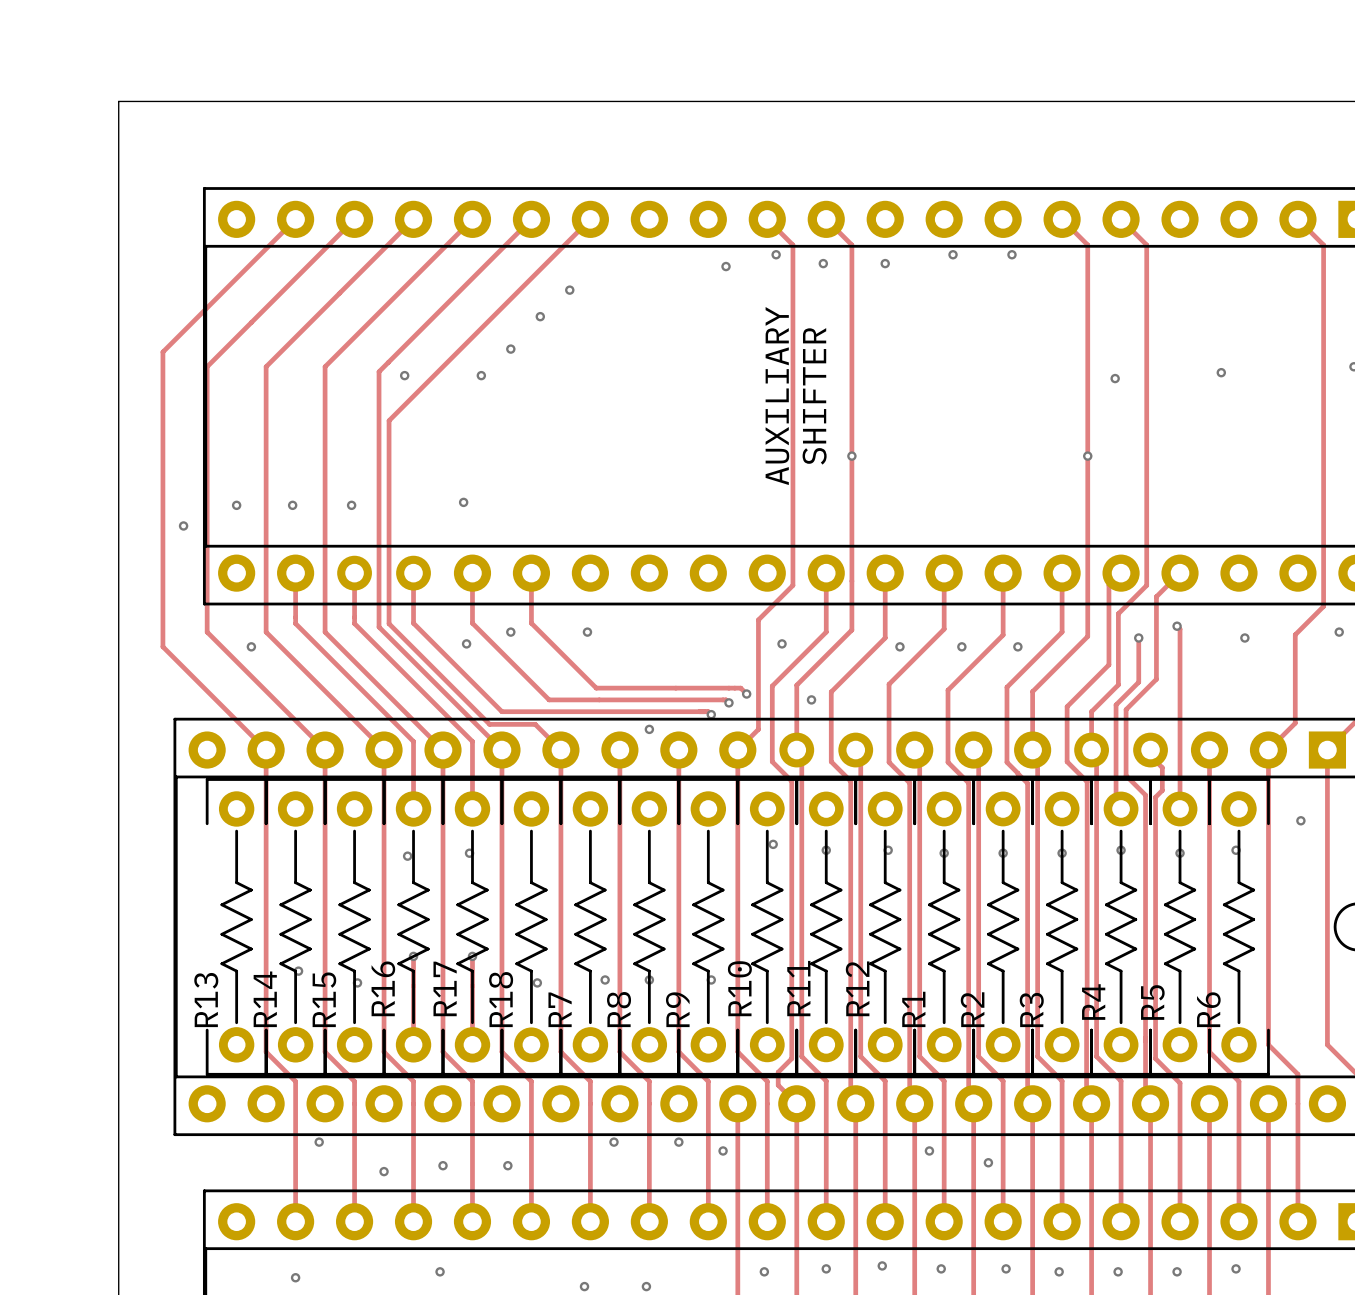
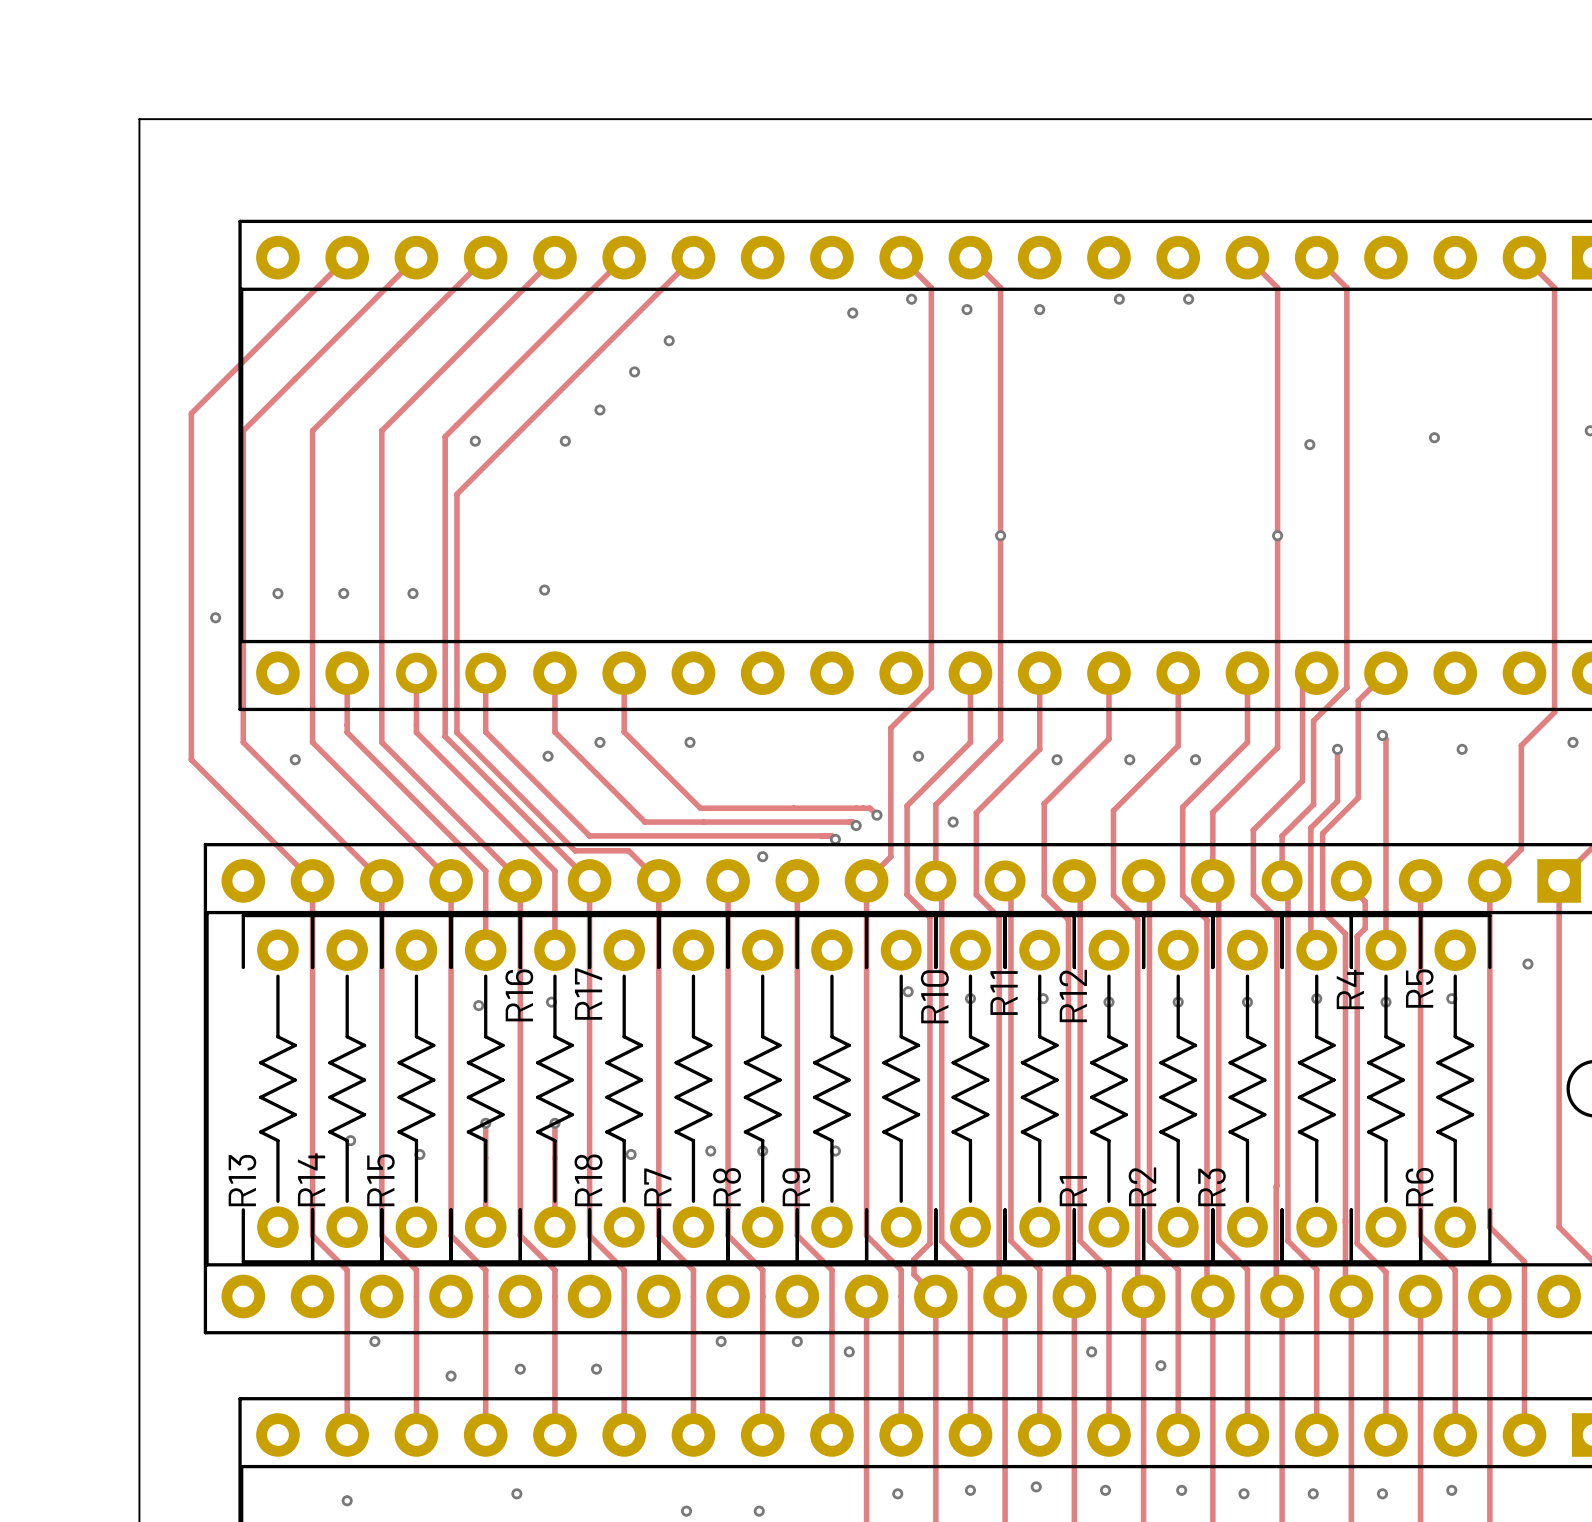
text: AUXILIARY (777, 396) -> none
text: SHIFTER (814, 396) -> none
R16 name position: R16 (383, 988) -> R16 (519, 995)
R17 name position: R17 (445, 988) -> R17 (588, 994)
R10 name position: R10 (739, 988) -> R10 (934, 996)
R11 name position: R11 (798, 988) -> R11 (1004, 993)
R12 name position: R12 (857, 988) -> R12 (1073, 995)
R4 name position: R4 (1093, 1002) -> R4 (1350, 989)
R5 name position: R5 (1152, 1002) -> R5 (1419, 988)

